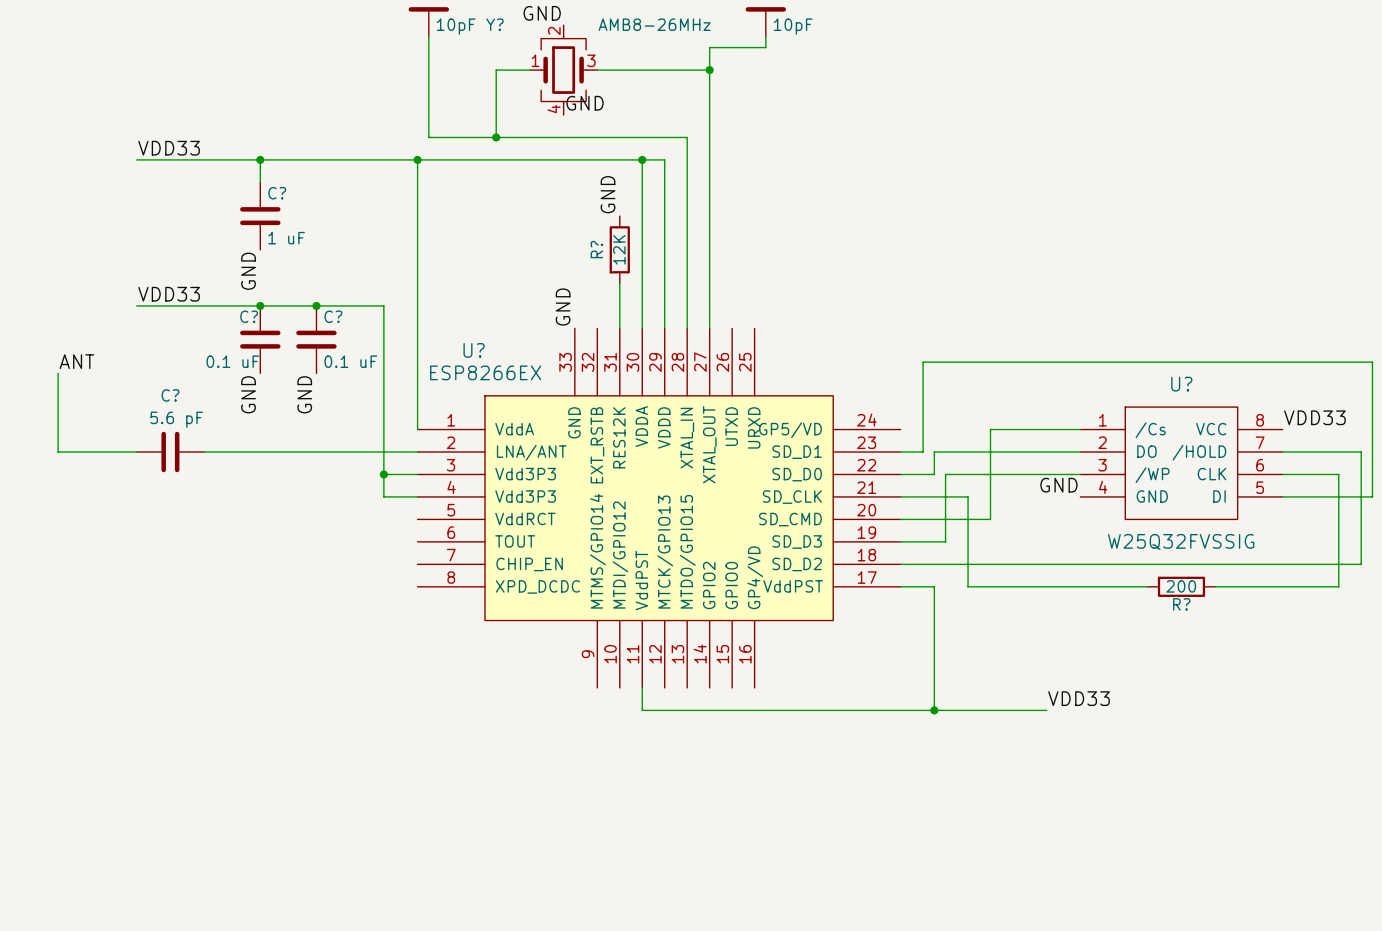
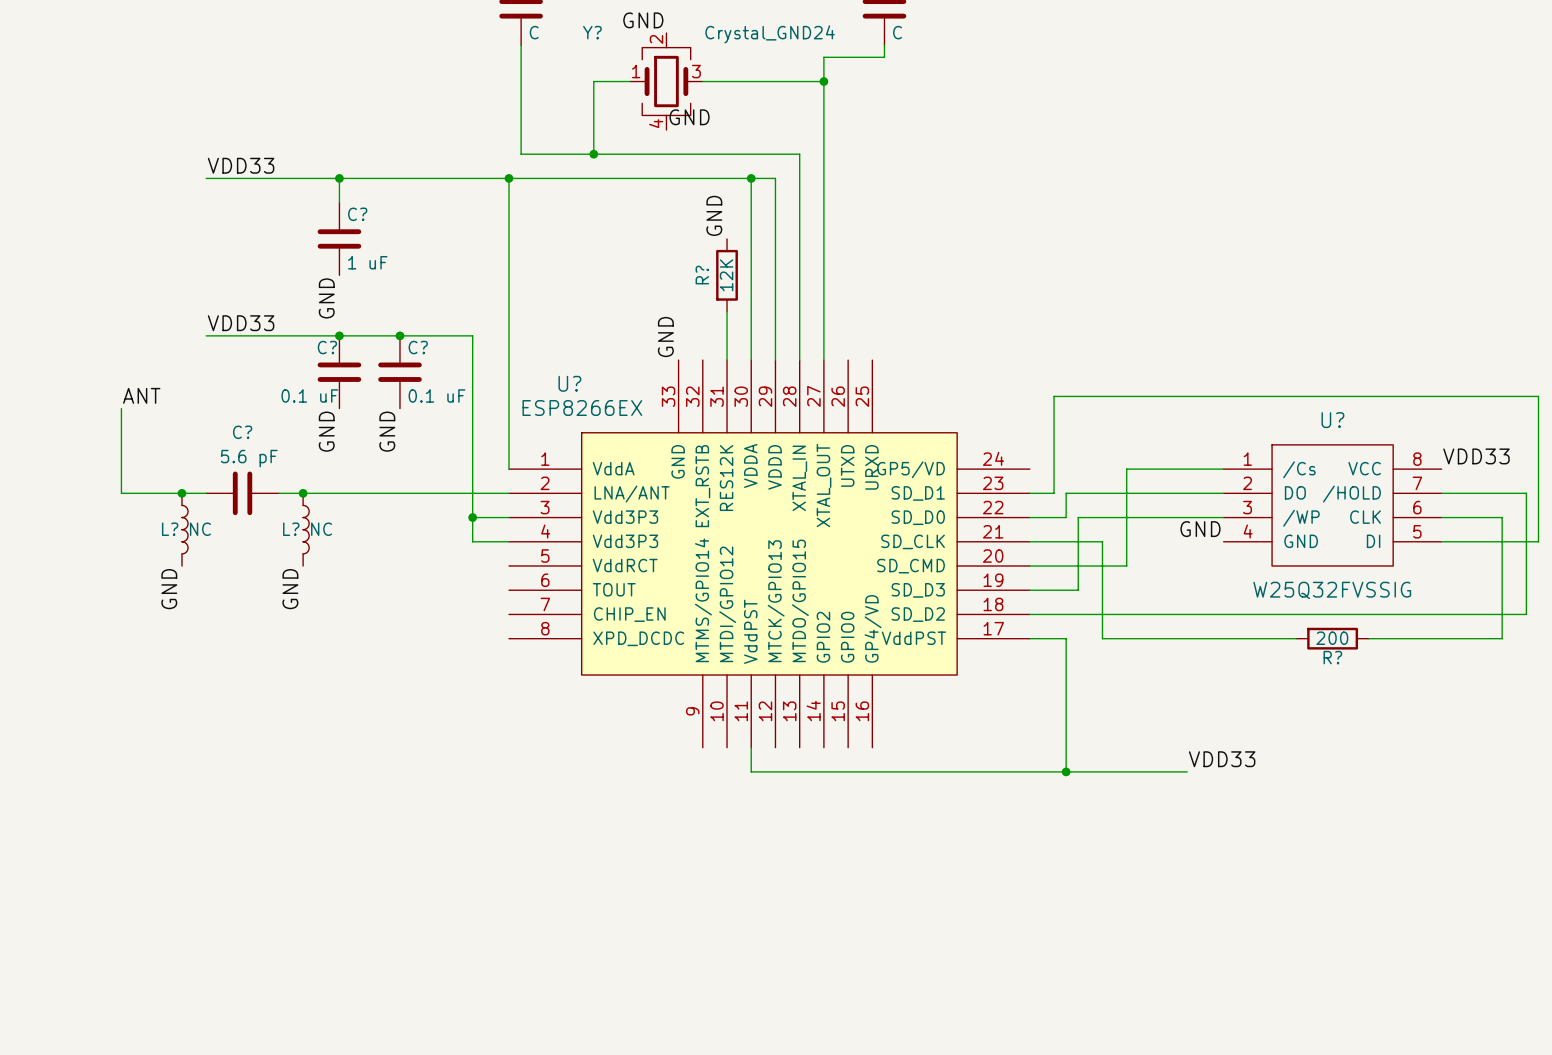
Y? value: AMB8-26MHz (654, 24) -> Crystal_GND24 (770, 34)
part value: 10pF (456, 26) -> C (534, 32)
part value: 10pF (793, 26) -> C (897, 32)
junction: none -> (181, 493)
junction: none -> (303, 493)
L?: none -> NC (185, 529)
L?: none -> NC (306, 529)
label: none -> GND (169, 589)
label: none -> GND (290, 589)

